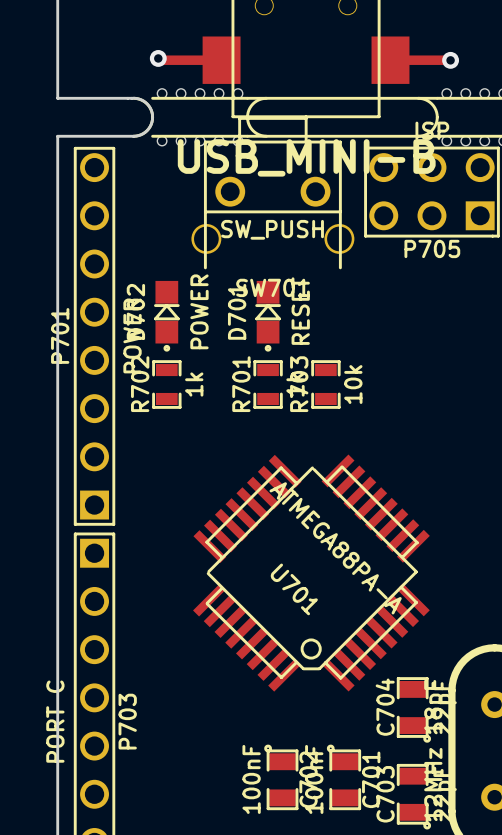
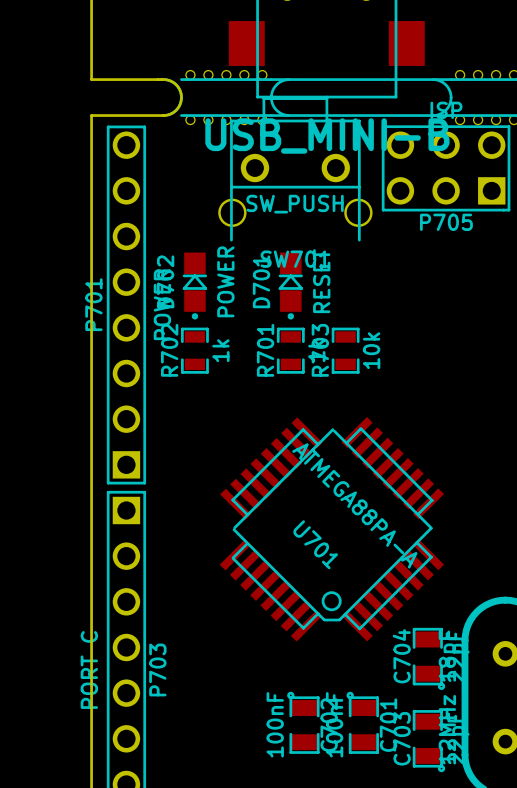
top track: (158, 58) (160, 60) (221, 60) -> none
via: (158, 58) -> none
top track: (390, 60) (450, 60) -> none
via: (450, 60) -> none

